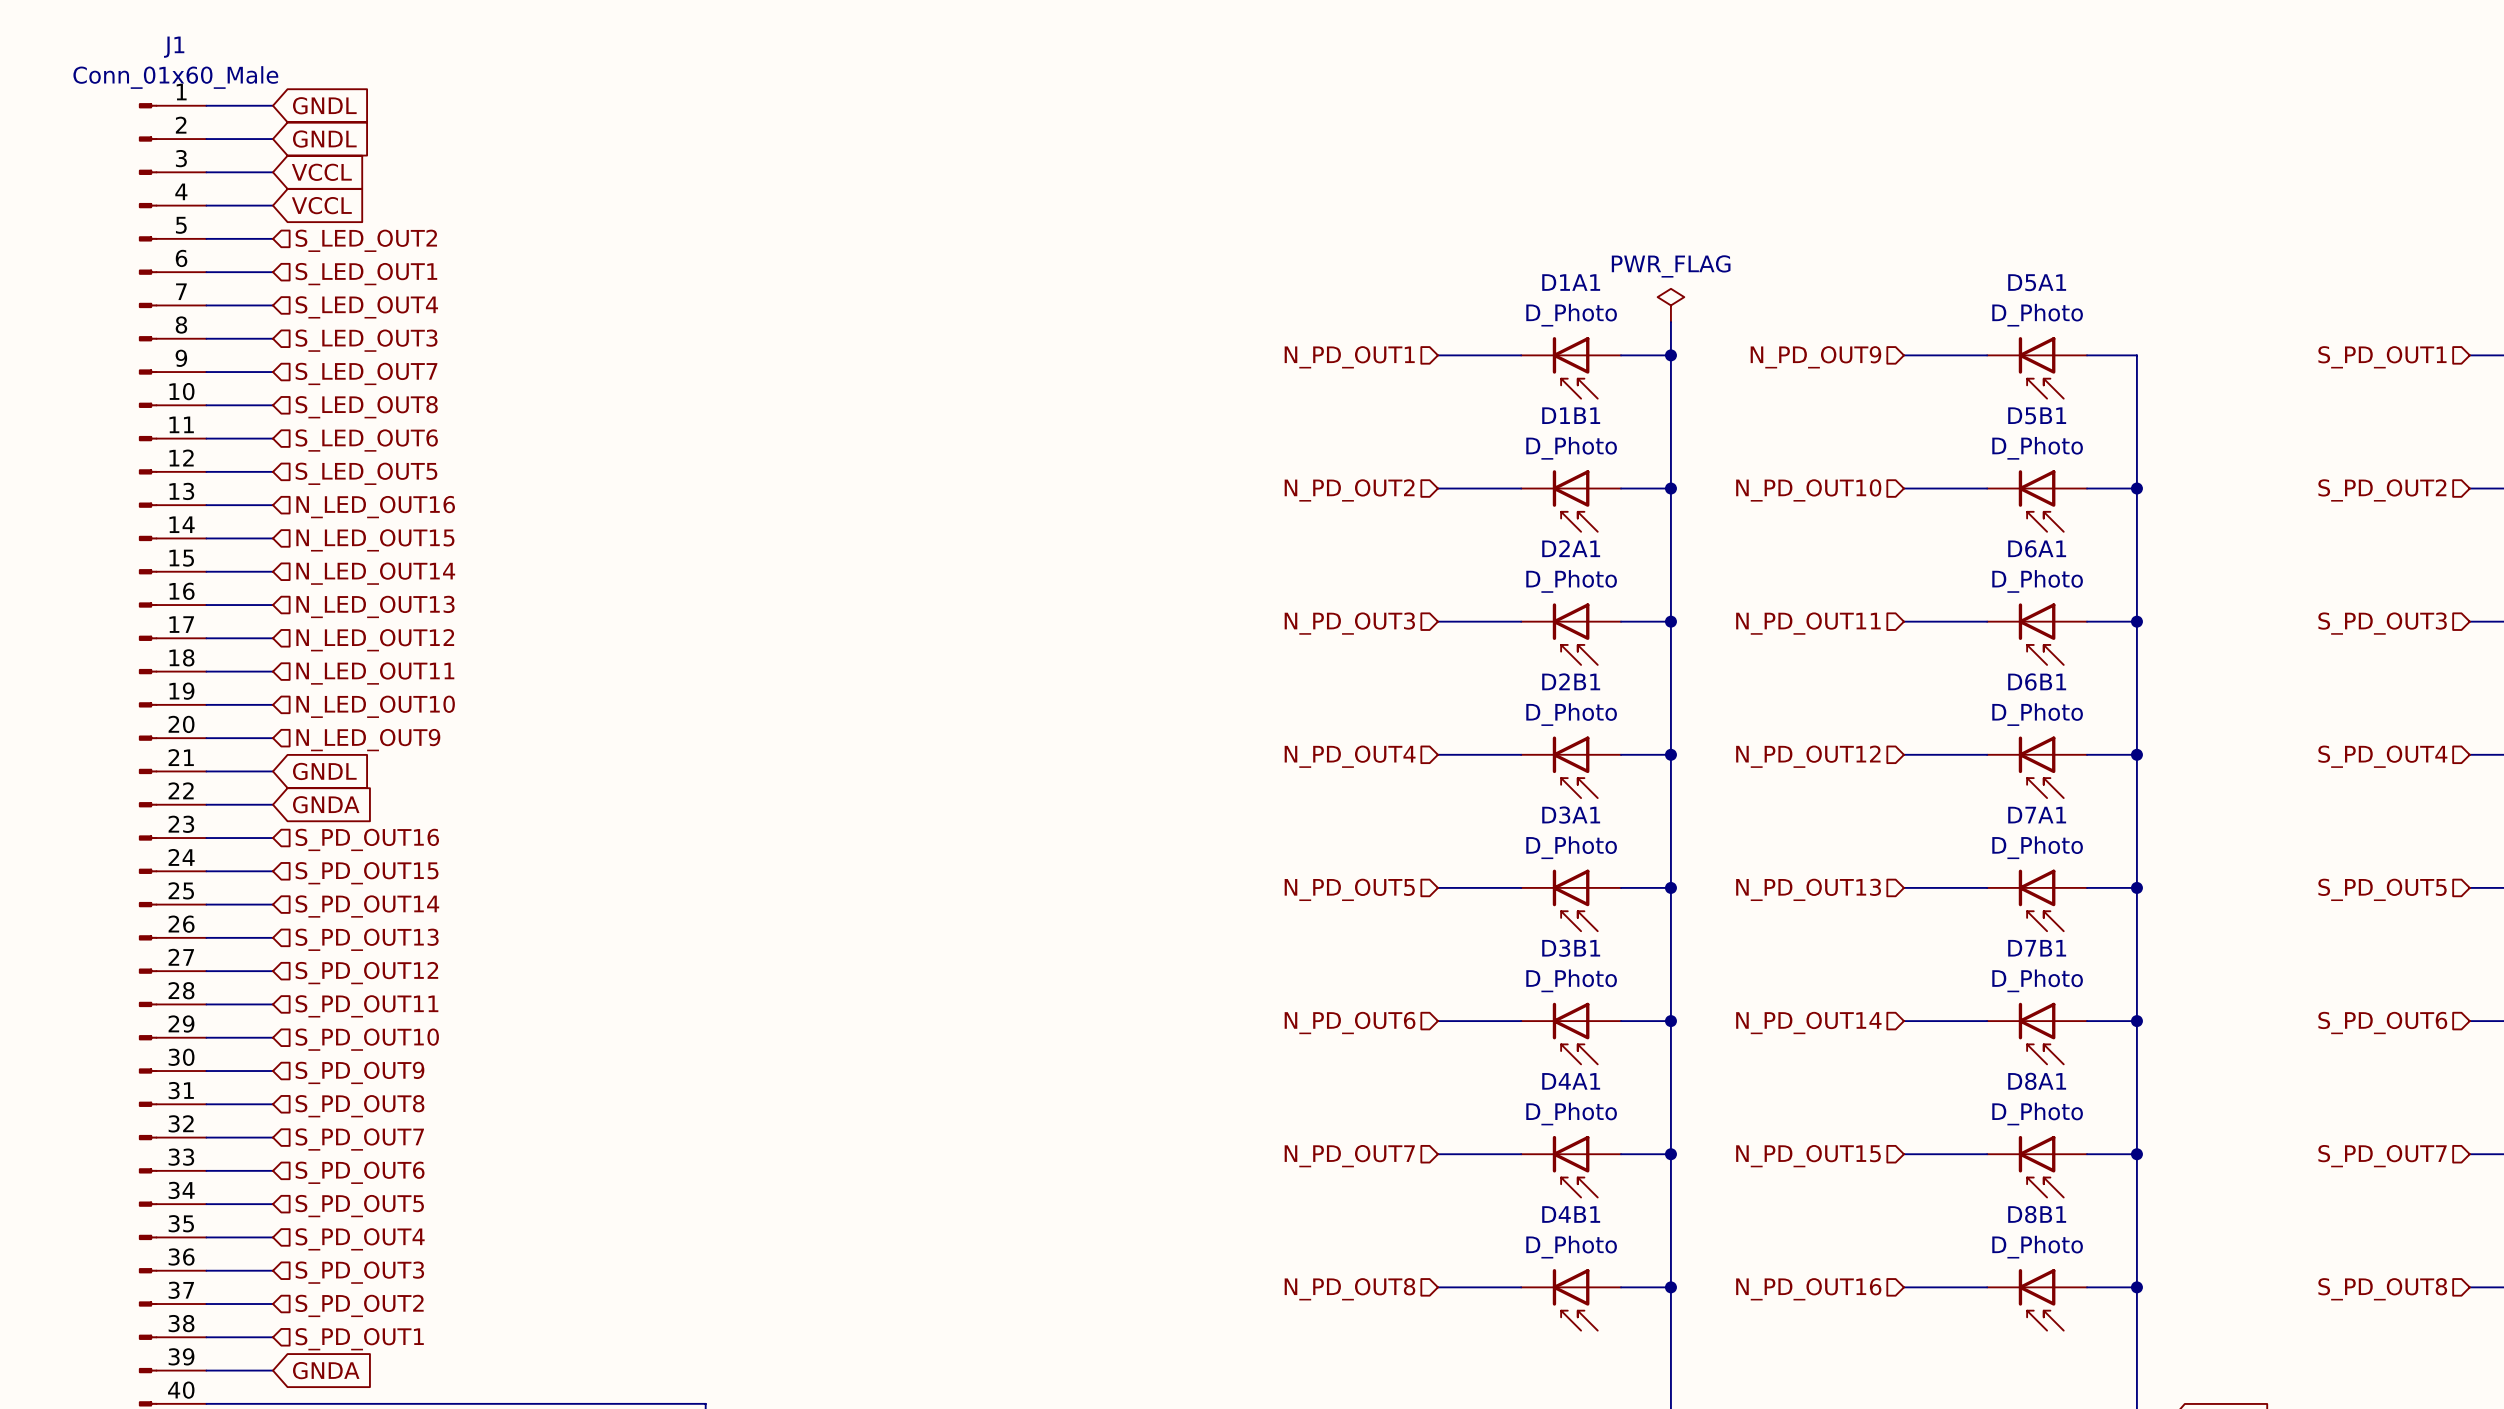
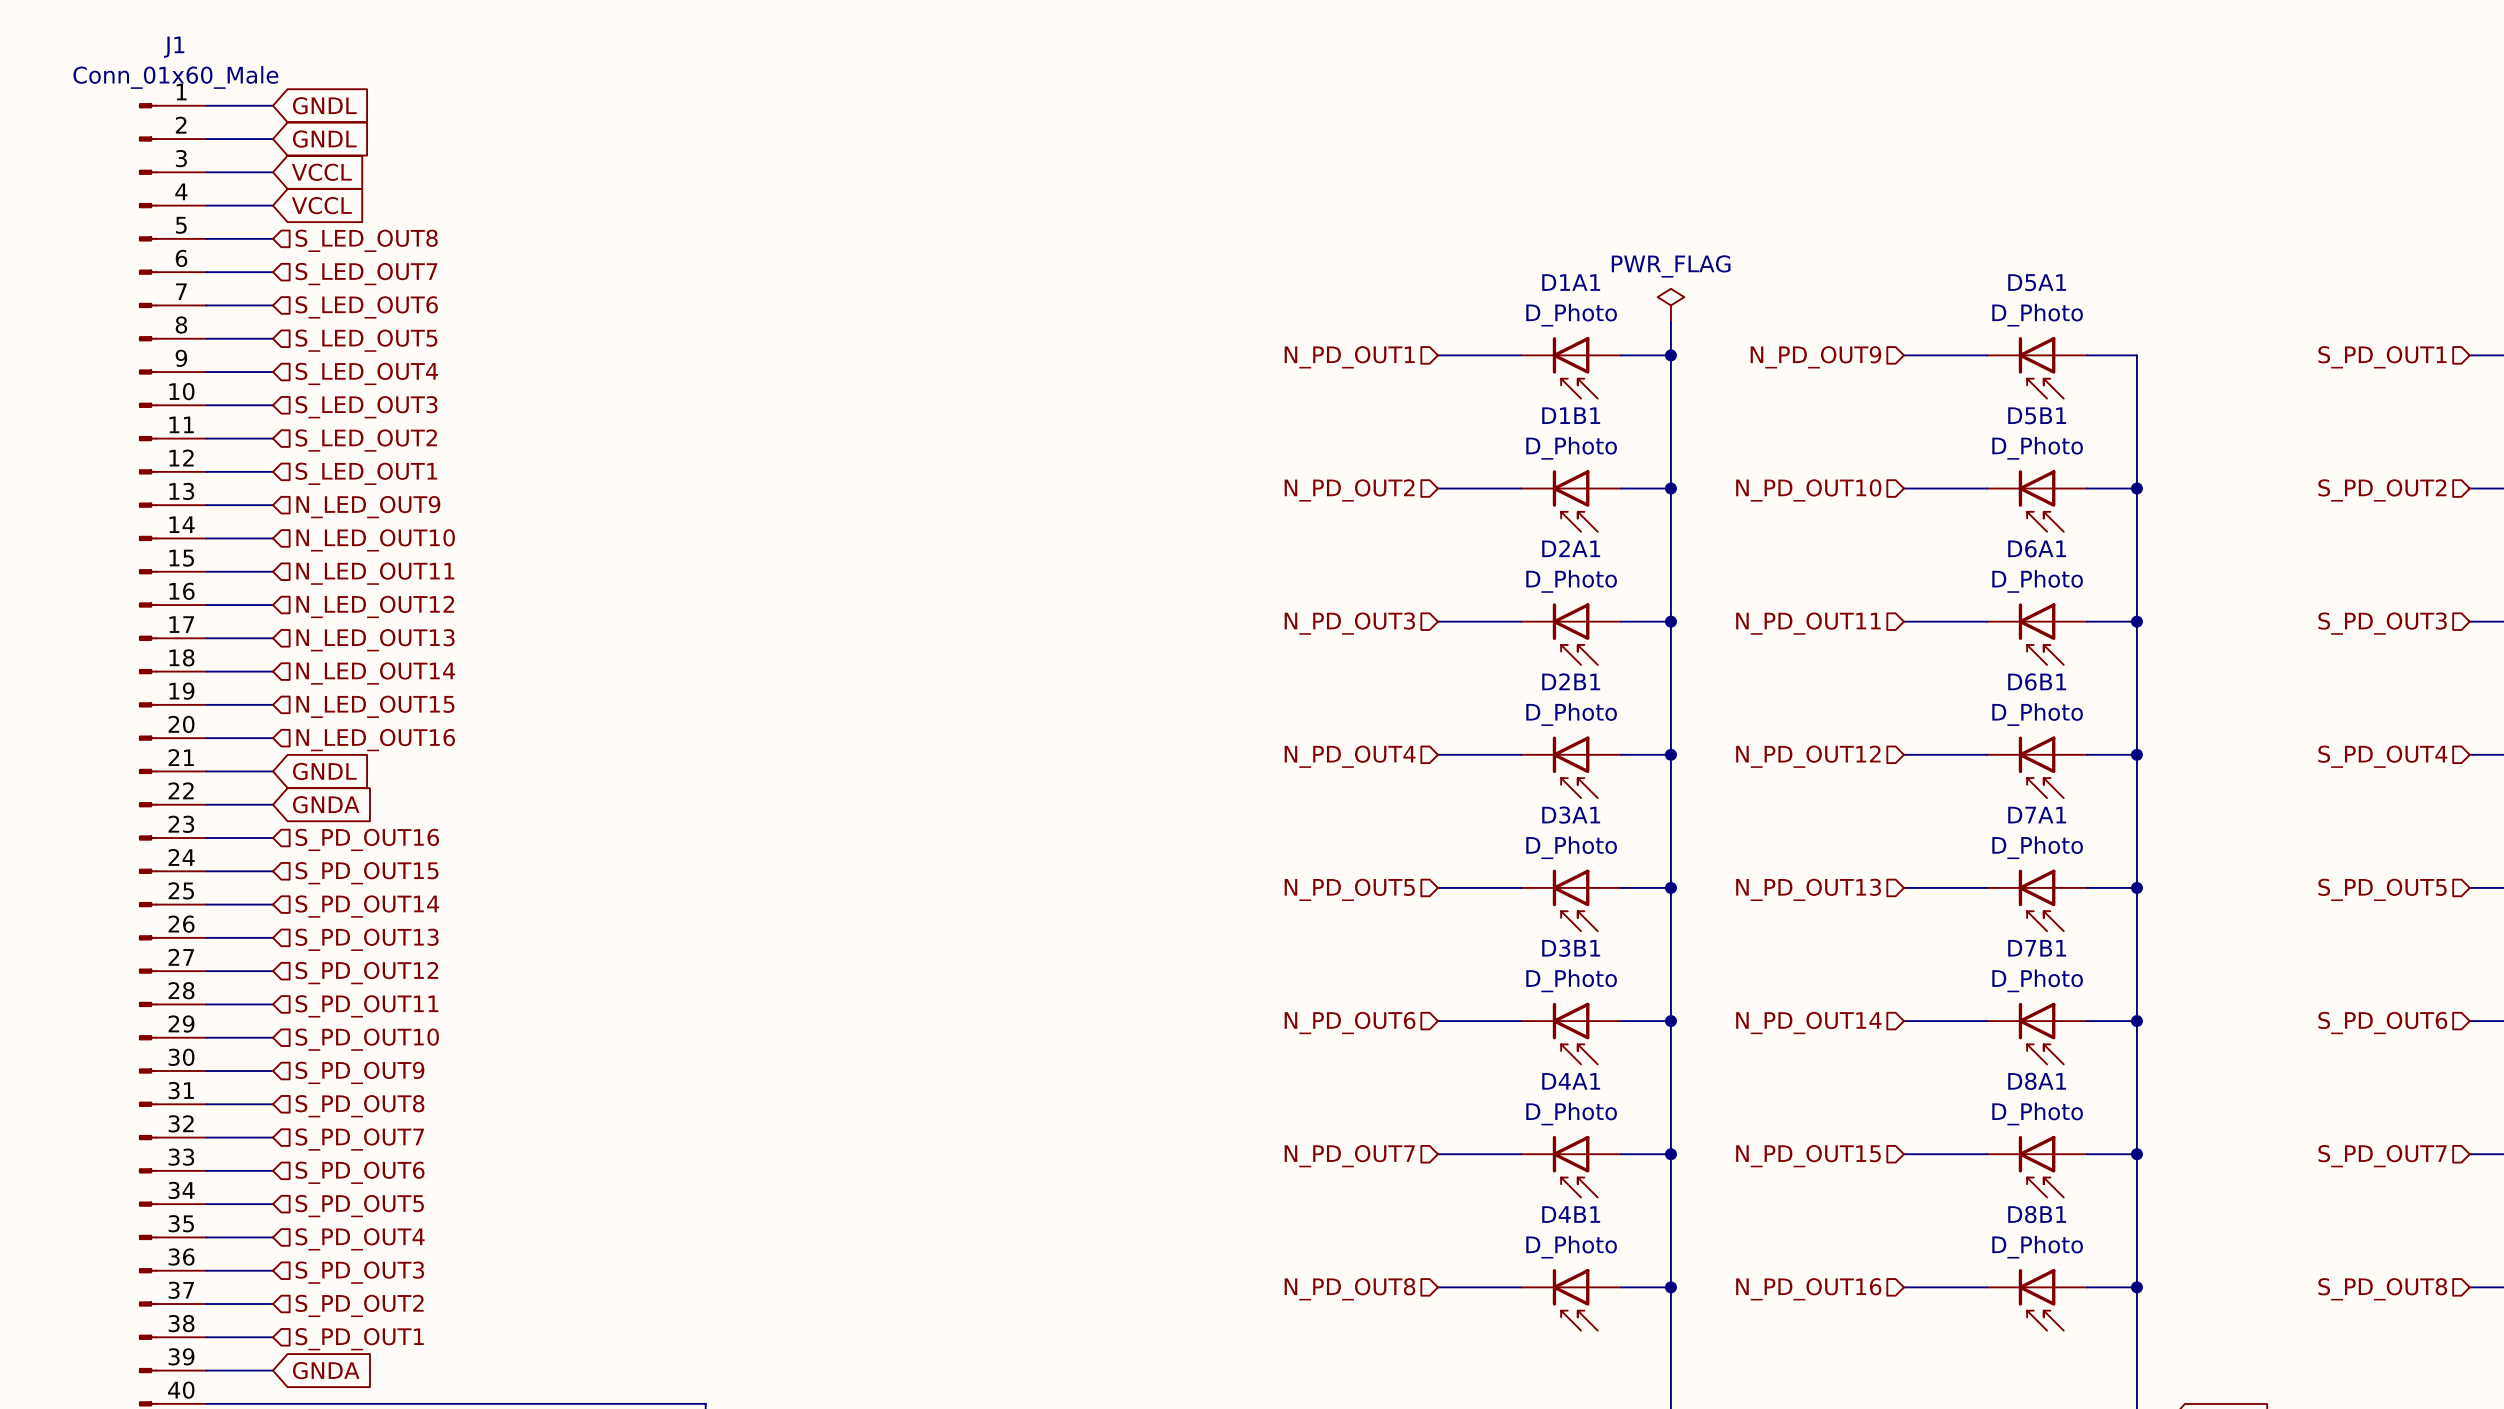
hierarchical label: S_LED_OUT2 (366, 240) -> S_LED_OUT8 (366, 240)
hierarchical label: S_LED_OUT1 (366, 274) -> S_LED_OUT7 (366, 274)
hierarchical label: S_LED_OUT4 (366, 307) -> S_LED_OUT6 (366, 307)
hierarchical label: S_LED_OUT3 (366, 340) -> S_LED_OUT5 (366, 340)
hierarchical label: S_LED_OUT7 (366, 373) -> S_LED_OUT4 (366, 373)
hierarchical label: S_LED_OUT8 (366, 407) -> S_LED_OUT3 (366, 407)
hierarchical label: S_LED_OUT6 (366, 440) -> S_LED_OUT2 (366, 440)
hierarchical label: S_LED_OUT5 (366, 473) -> S_LED_OUT1 (366, 473)
hierarchical label: N_LED_OUT16 (375, 507) -> N_LED_OUT9 (368, 507)
hierarchical label: N_LED_OUT15 (375, 540) -> N_LED_OUT10 (375, 540)
hierarchical label: N_LED_OUT14 (375, 573) -> N_LED_OUT11 (375, 573)
hierarchical label: N_LED_OUT13 (375, 606) -> N_LED_OUT12 (375, 606)
hierarchical label: N_LED_OUT12 (375, 640) -> N_LED_OUT13 (375, 640)
hierarchical label: N_LED_OUT11 (375, 673) -> N_LED_OUT14 (375, 673)
hierarchical label: N_LED_OUT10 (375, 706) -> N_LED_OUT15 (375, 706)
hierarchical label: N_LED_OUT9 (368, 740) -> N_LED_OUT16 (375, 740)

